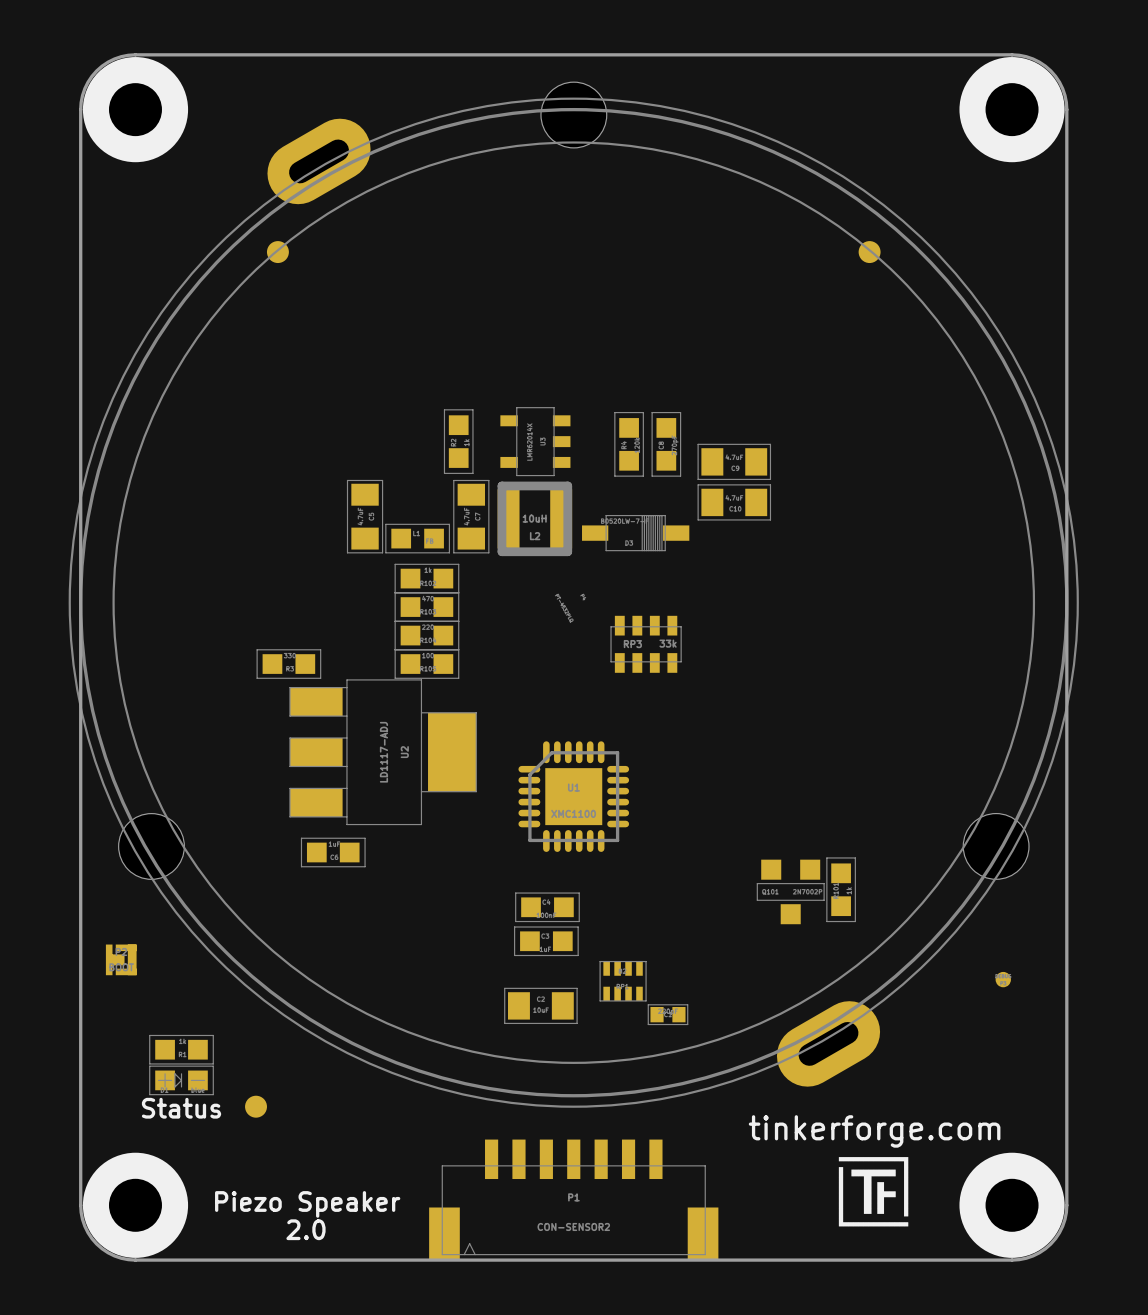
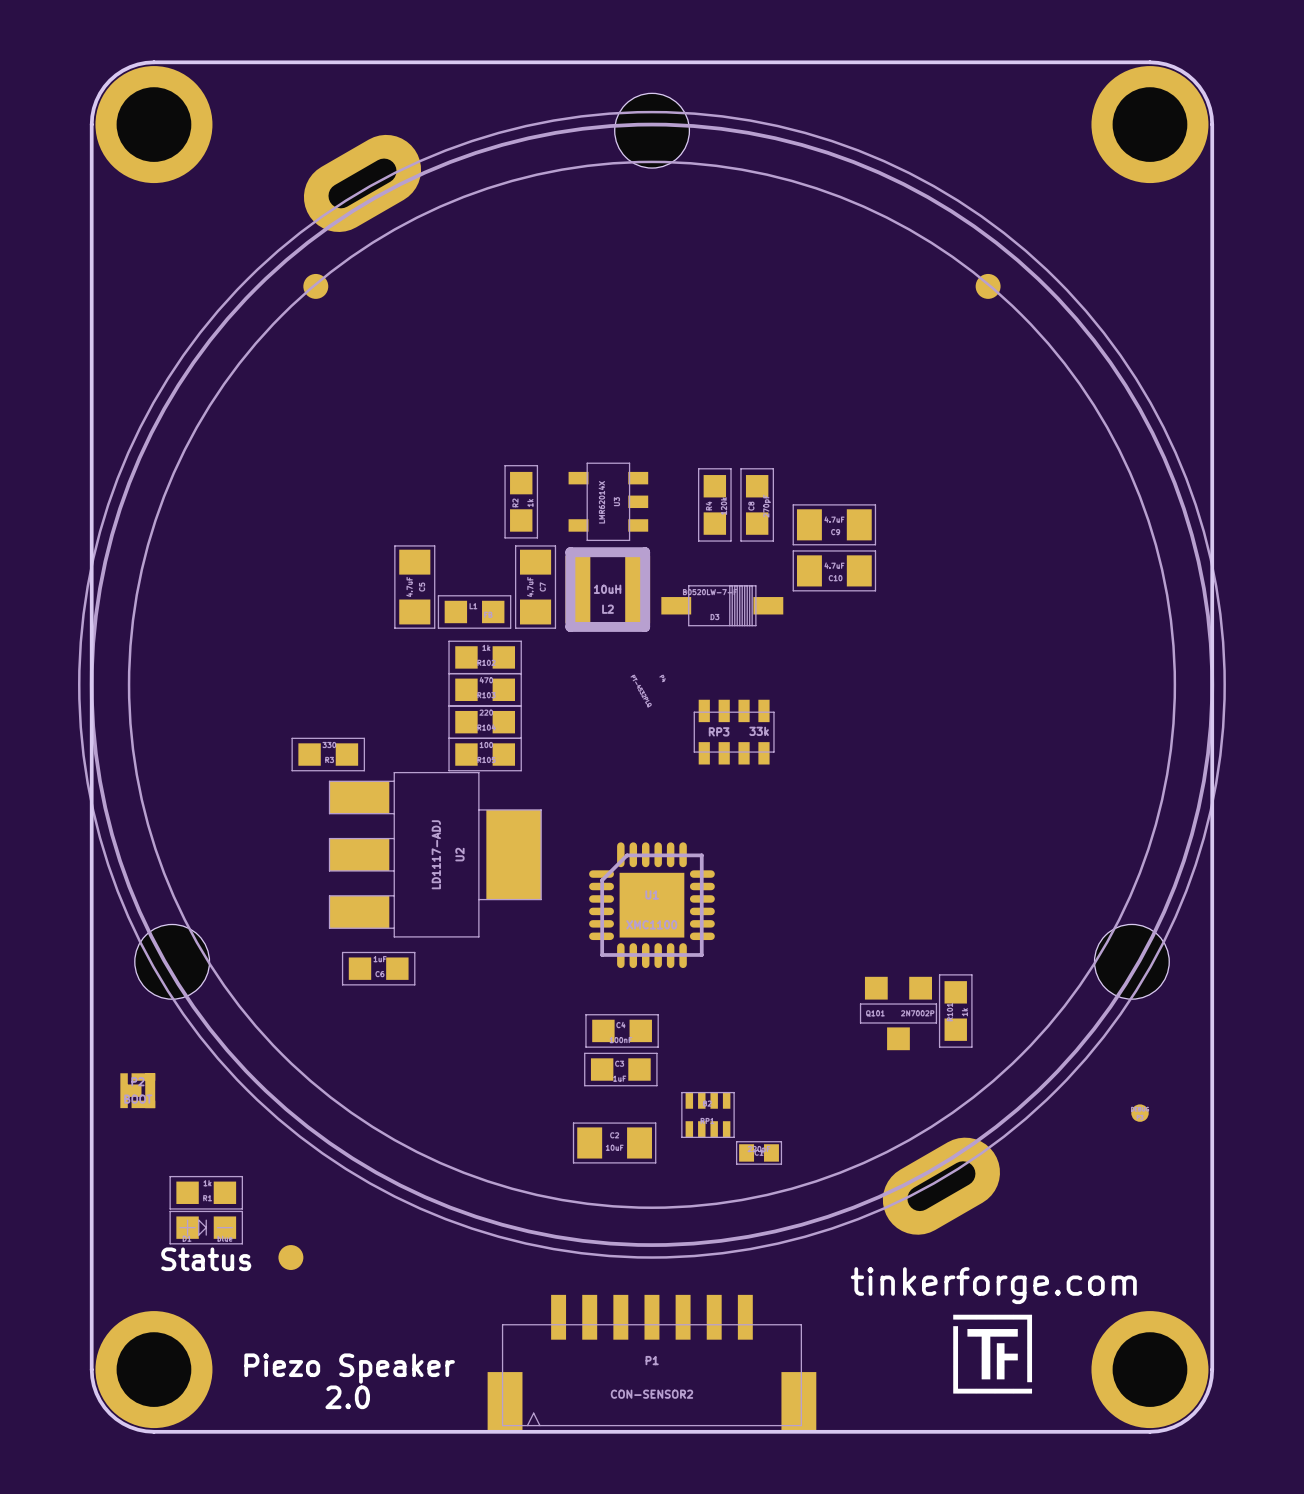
part footprint: [82, 57, 189, 163] -> [95, 66, 213, 184]
part footprint: [959, 57, 1065, 163] -> [1091, 66, 1209, 184]
part footprint: [82, 1152, 189, 1258] -> [95, 1311, 213, 1429]
part footprint: [959, 1152, 1065, 1258] -> [1091, 1311, 1209, 1429]

